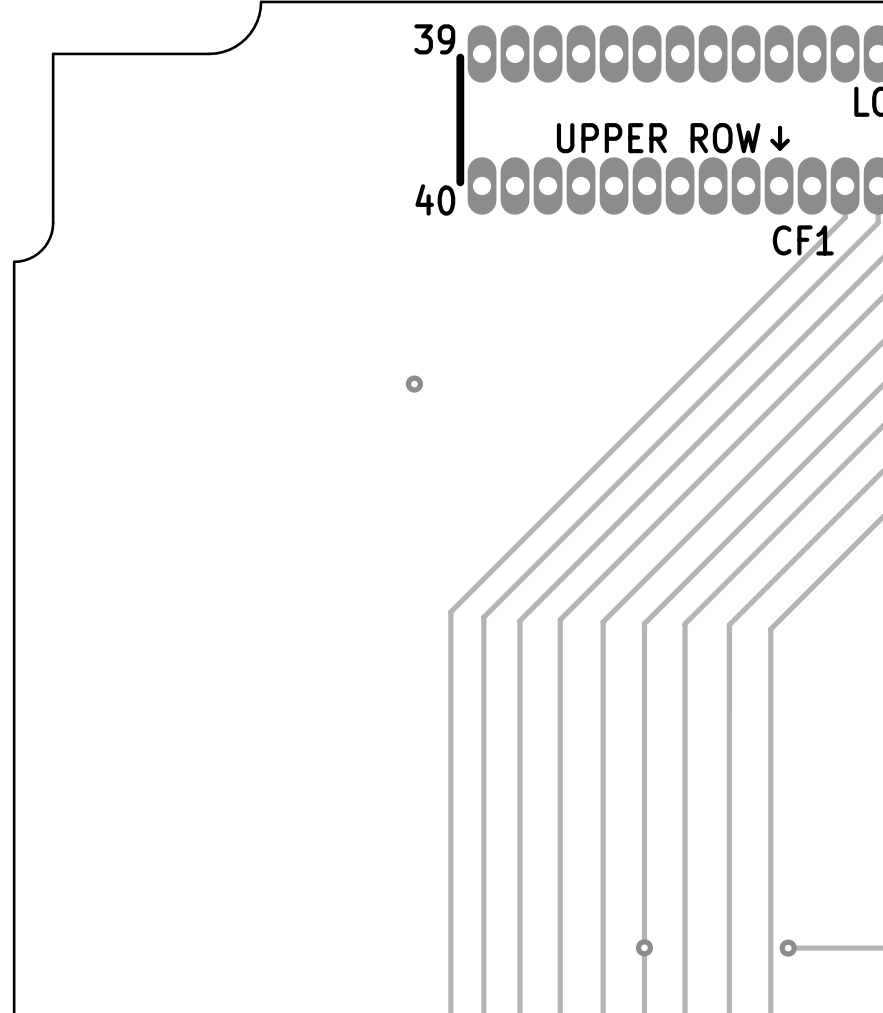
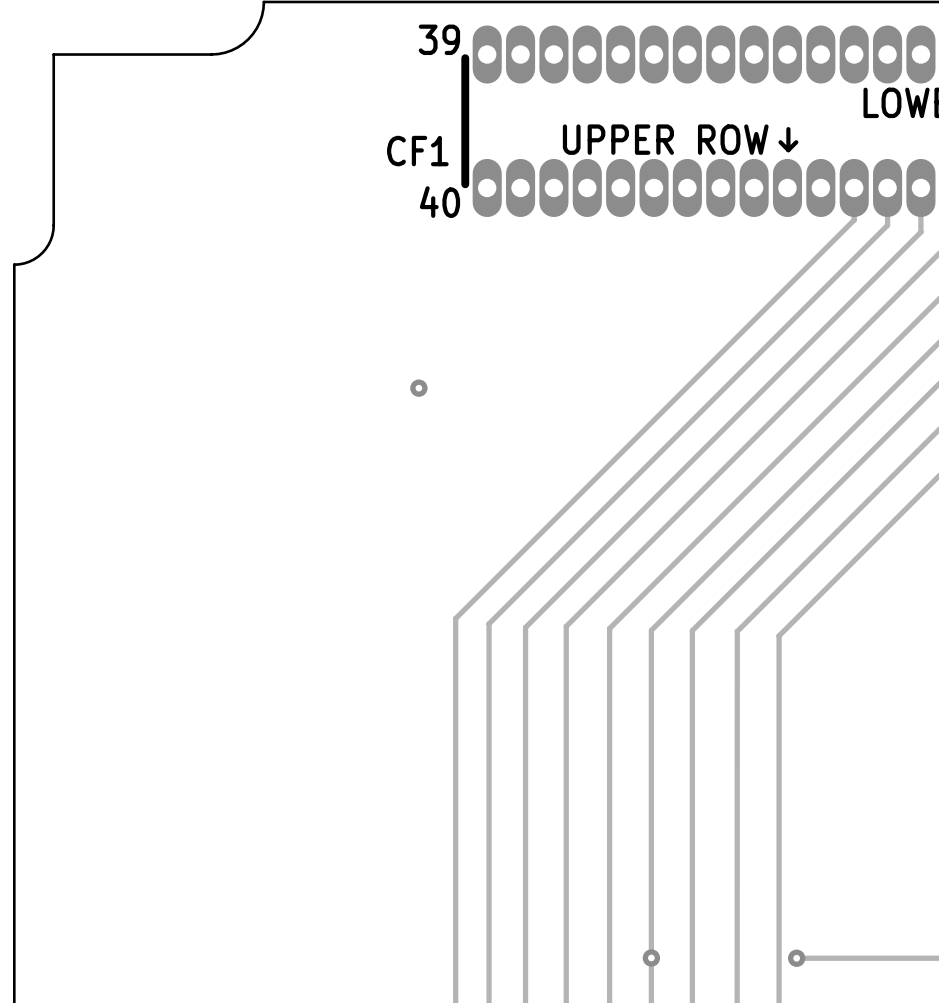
CF1 name position: CF1 (803, 240) -> CF1 (417, 151)

